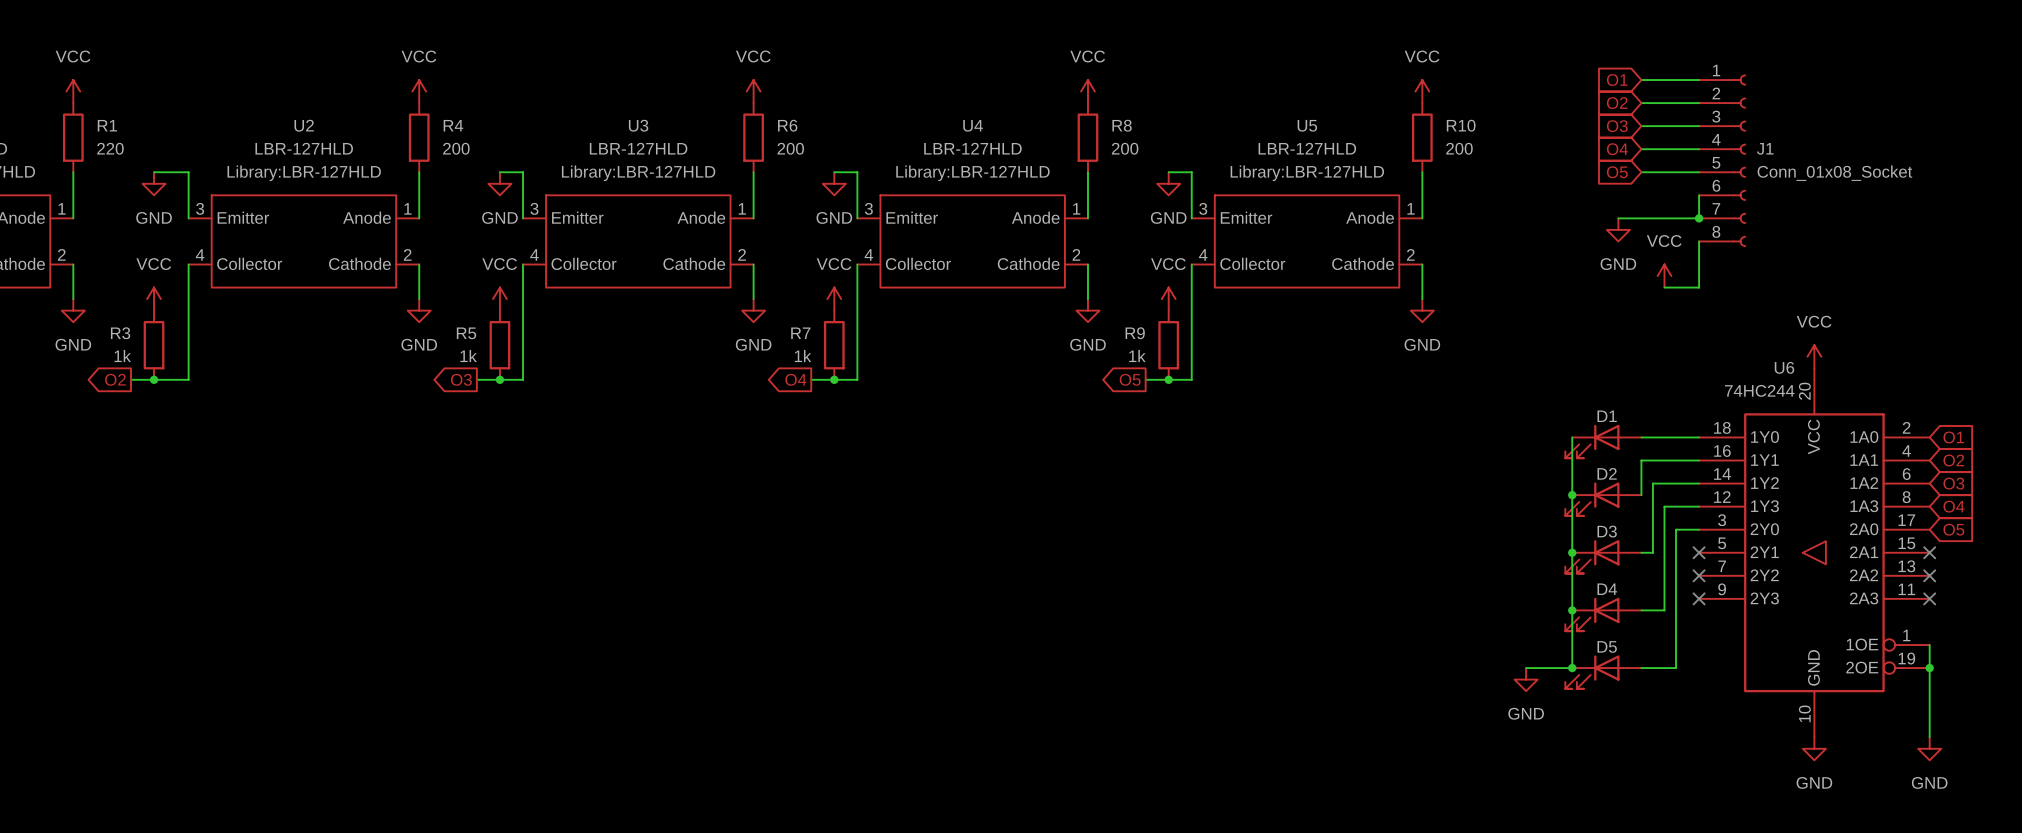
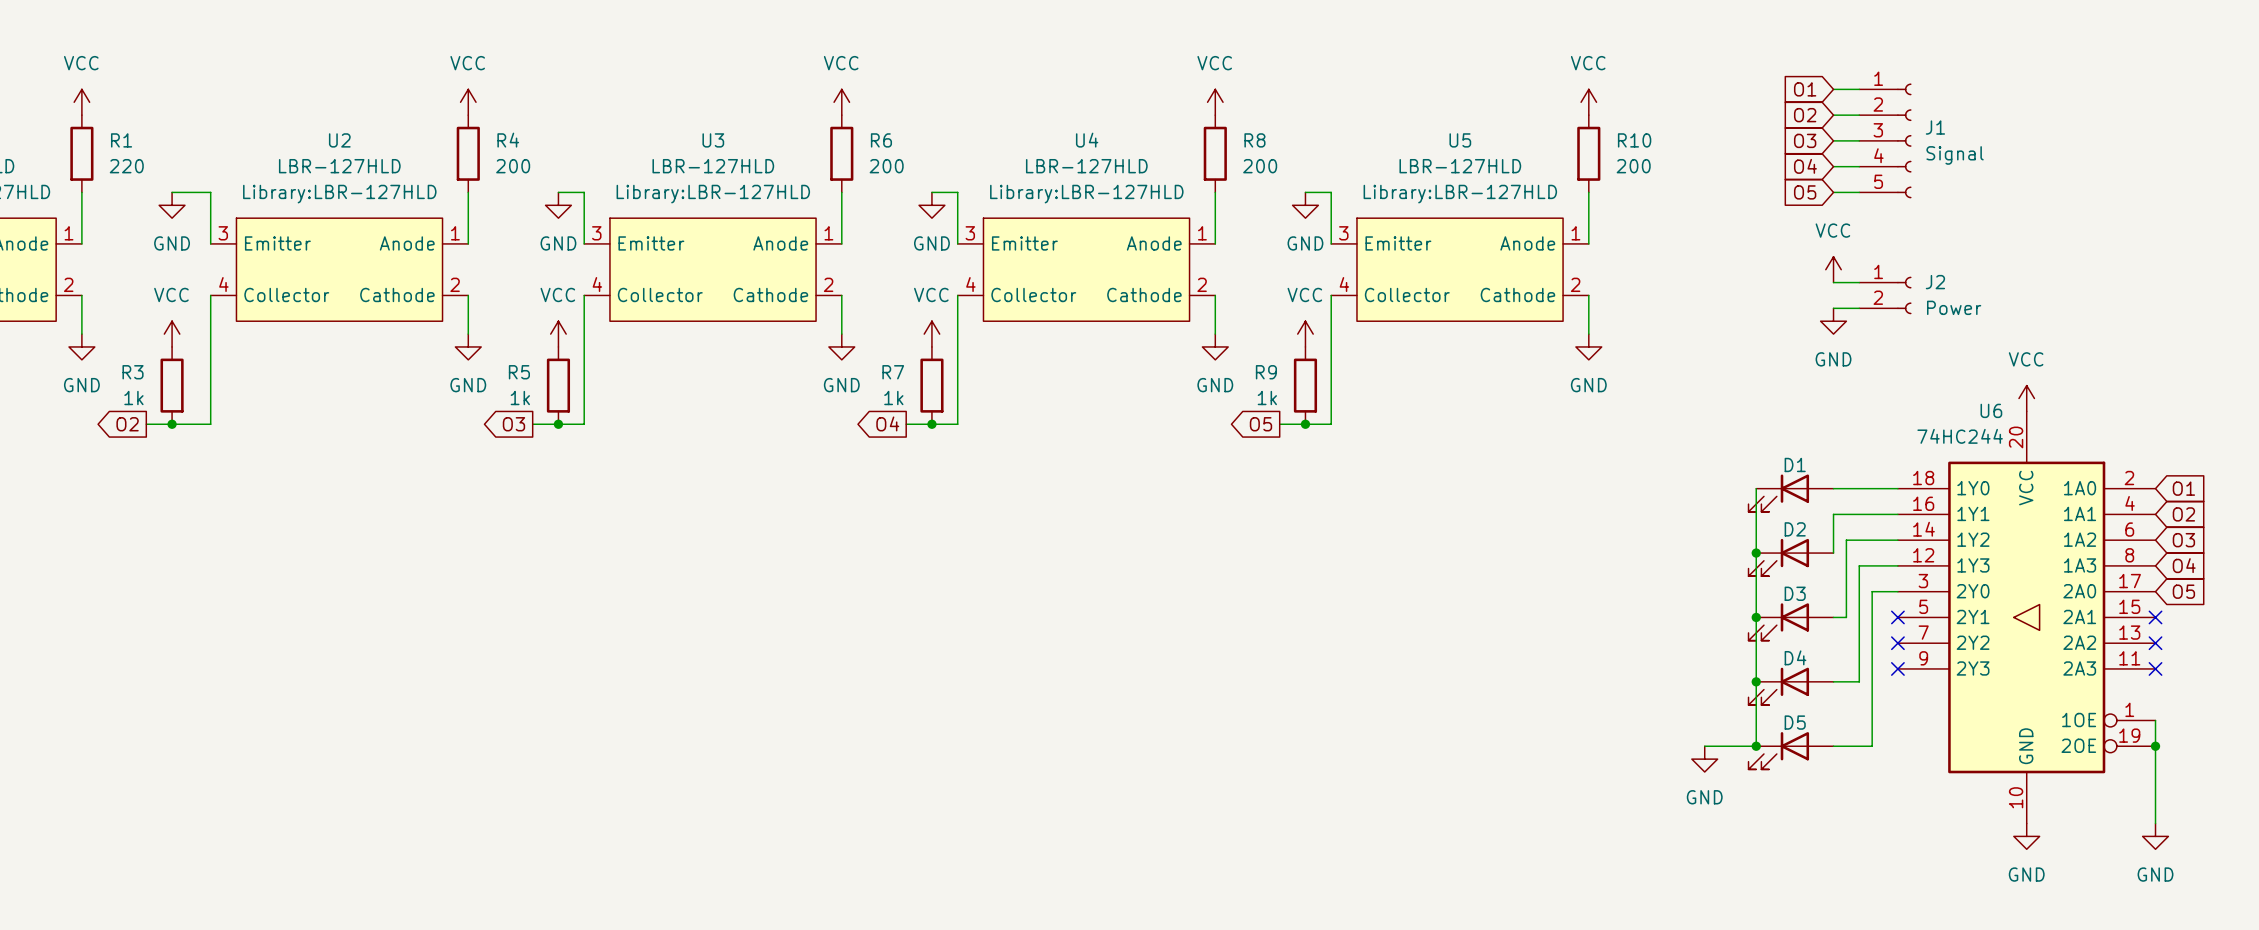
J1 symbol: [1699, 74, 1746, 247] -> [1859, 83, 1912, 199]
J1 value: Conn_01x08_Socket (1834, 173) -> Signal (1955, 155)
wire: (1699, 195) (1699, 218) (1618, 218) -> none
junction: (1699, 218) -> none
power symbol position: GND (1618, 229) -> GND (1833, 321)
wire: (1699, 241) (1699, 287) (1664, 287) -> none
wire: none -> (1833, 282) (1859, 282)
J2: none -> Power (1885, 295)
wire: none -> (1833, 308) (1859, 308)
power symbol position: VCC (1664, 276) -> VCC (1833, 269)

